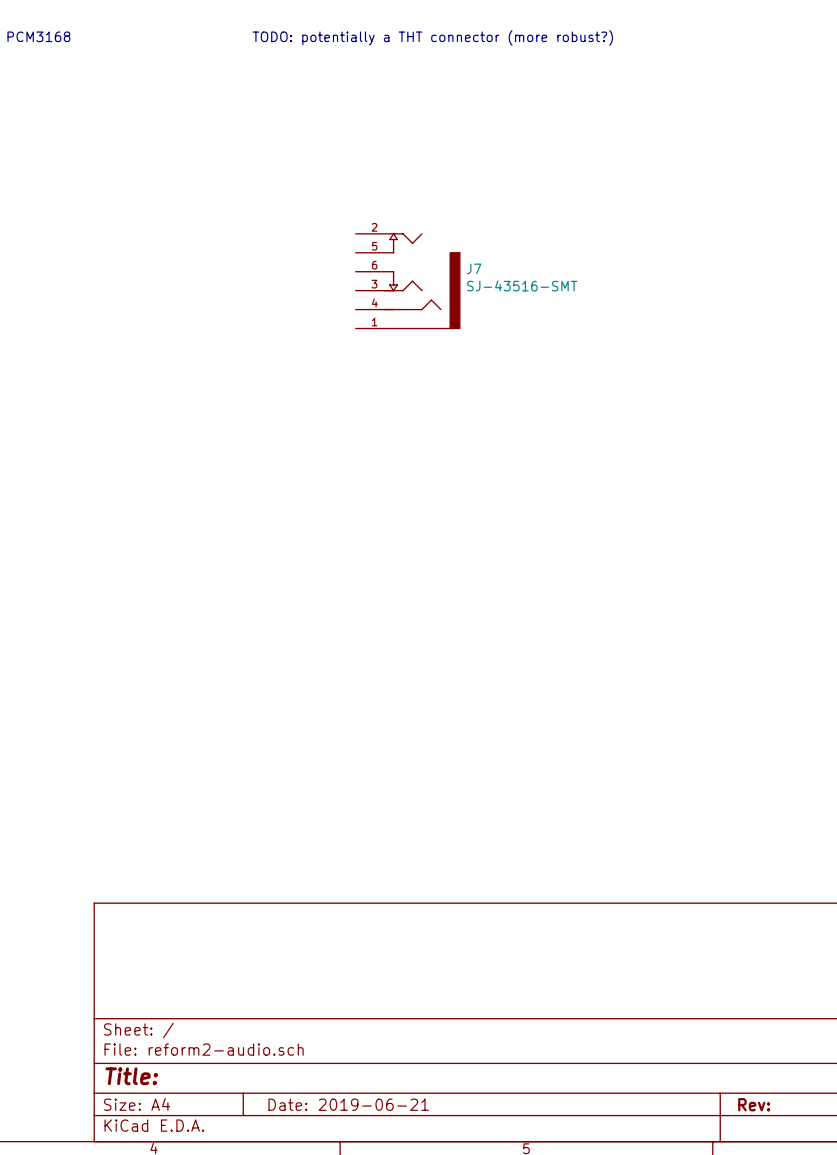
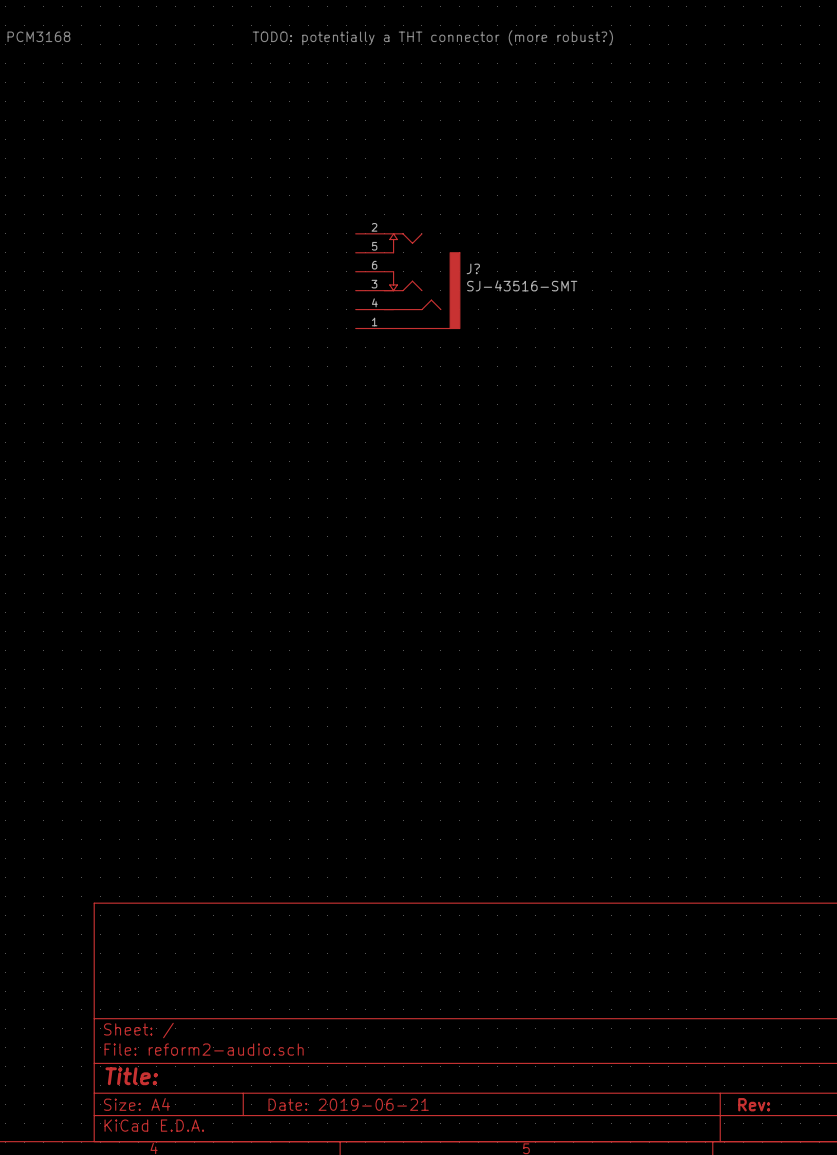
J7 name: J7 (473, 268) -> J? (473, 268)

